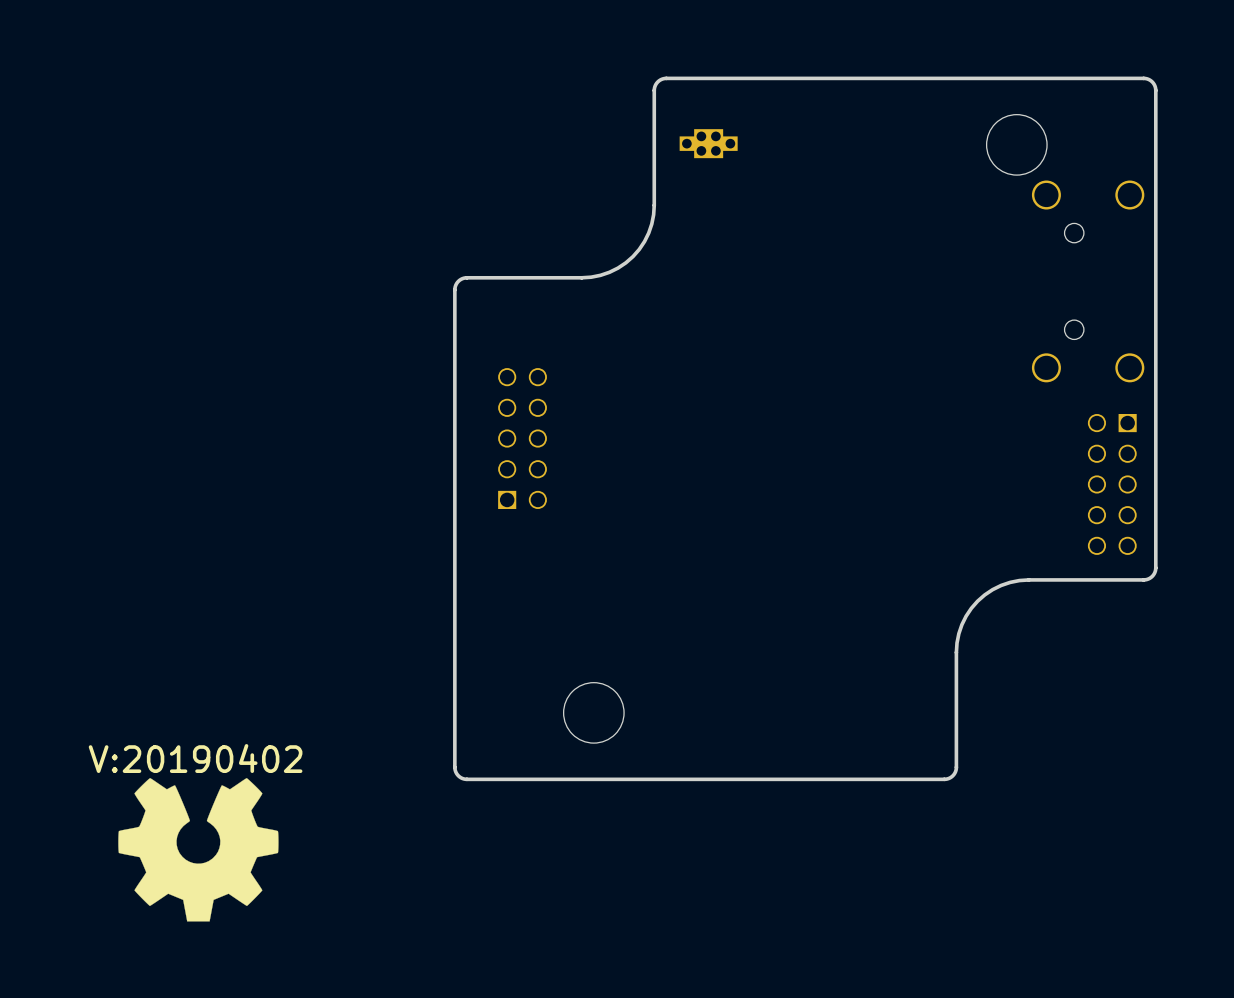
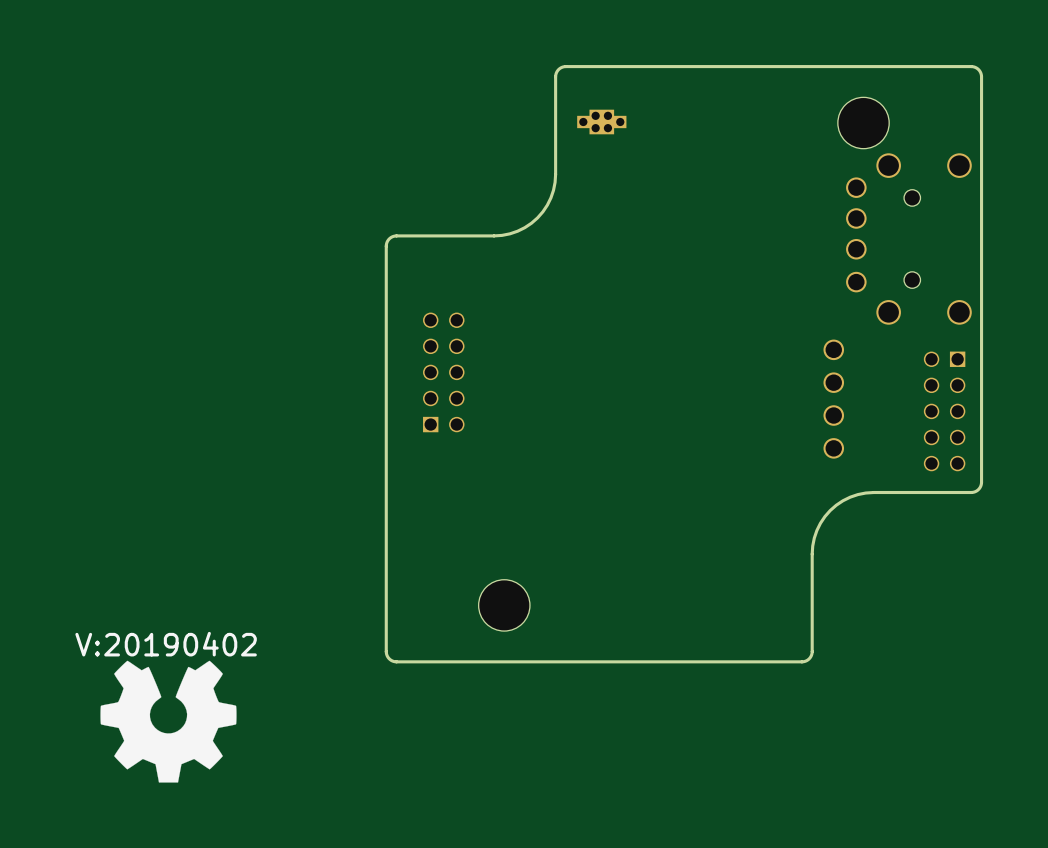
part: none -> (856, 187)
part: none -> (856, 218)
part: none -> (856, 249)
part: none -> (856, 282)
part: none -> (833, 349)
part: none -> (833, 382)
part: none -> (833, 415)
part: none -> (833, 448)

